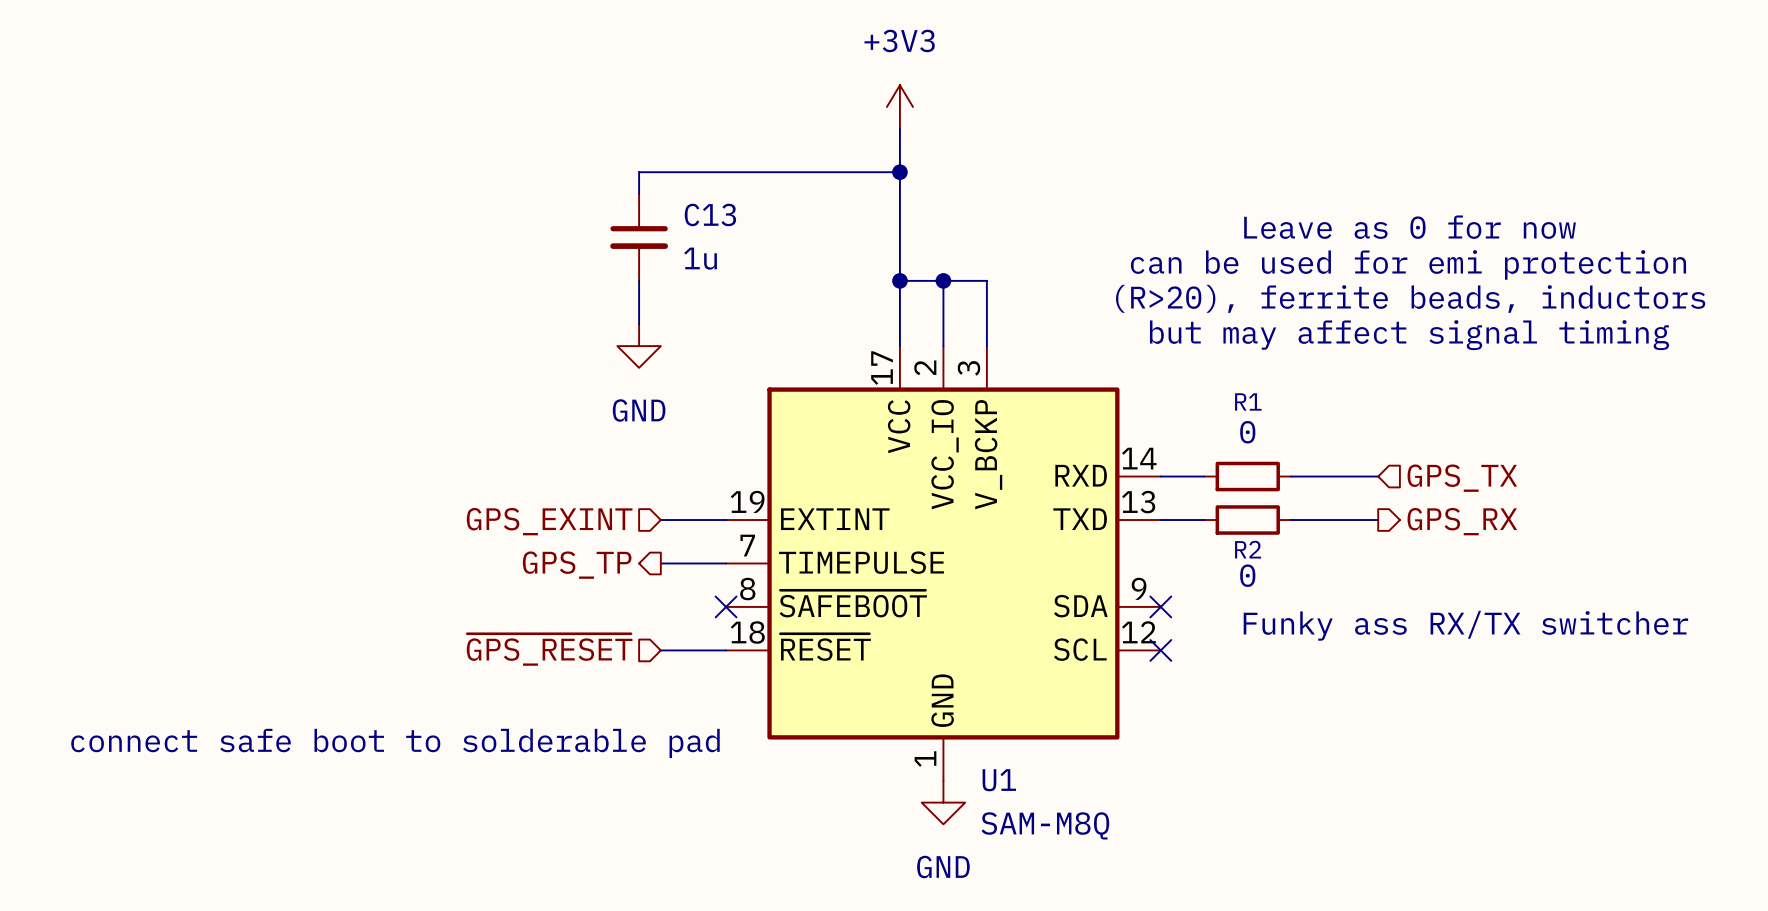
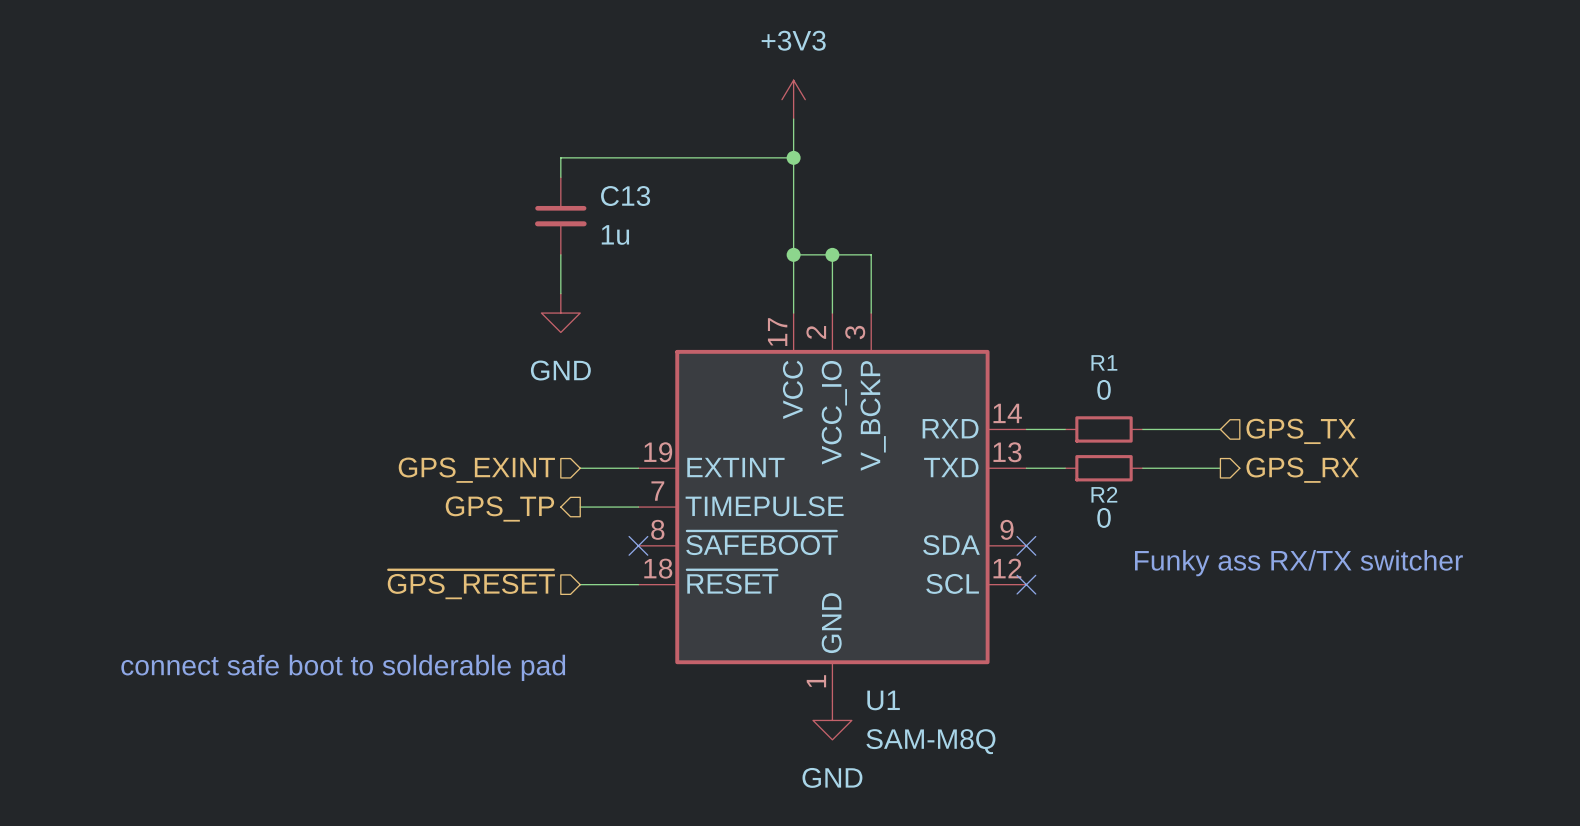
text: Leave as 0 for now (1410, 227) -> none
text: can be used for emi protection (1408, 264) -> none
text: (R>20), ferrite beads, inductors (1410, 298) -> none
text: but may affect signal timing (1409, 335) -> none

